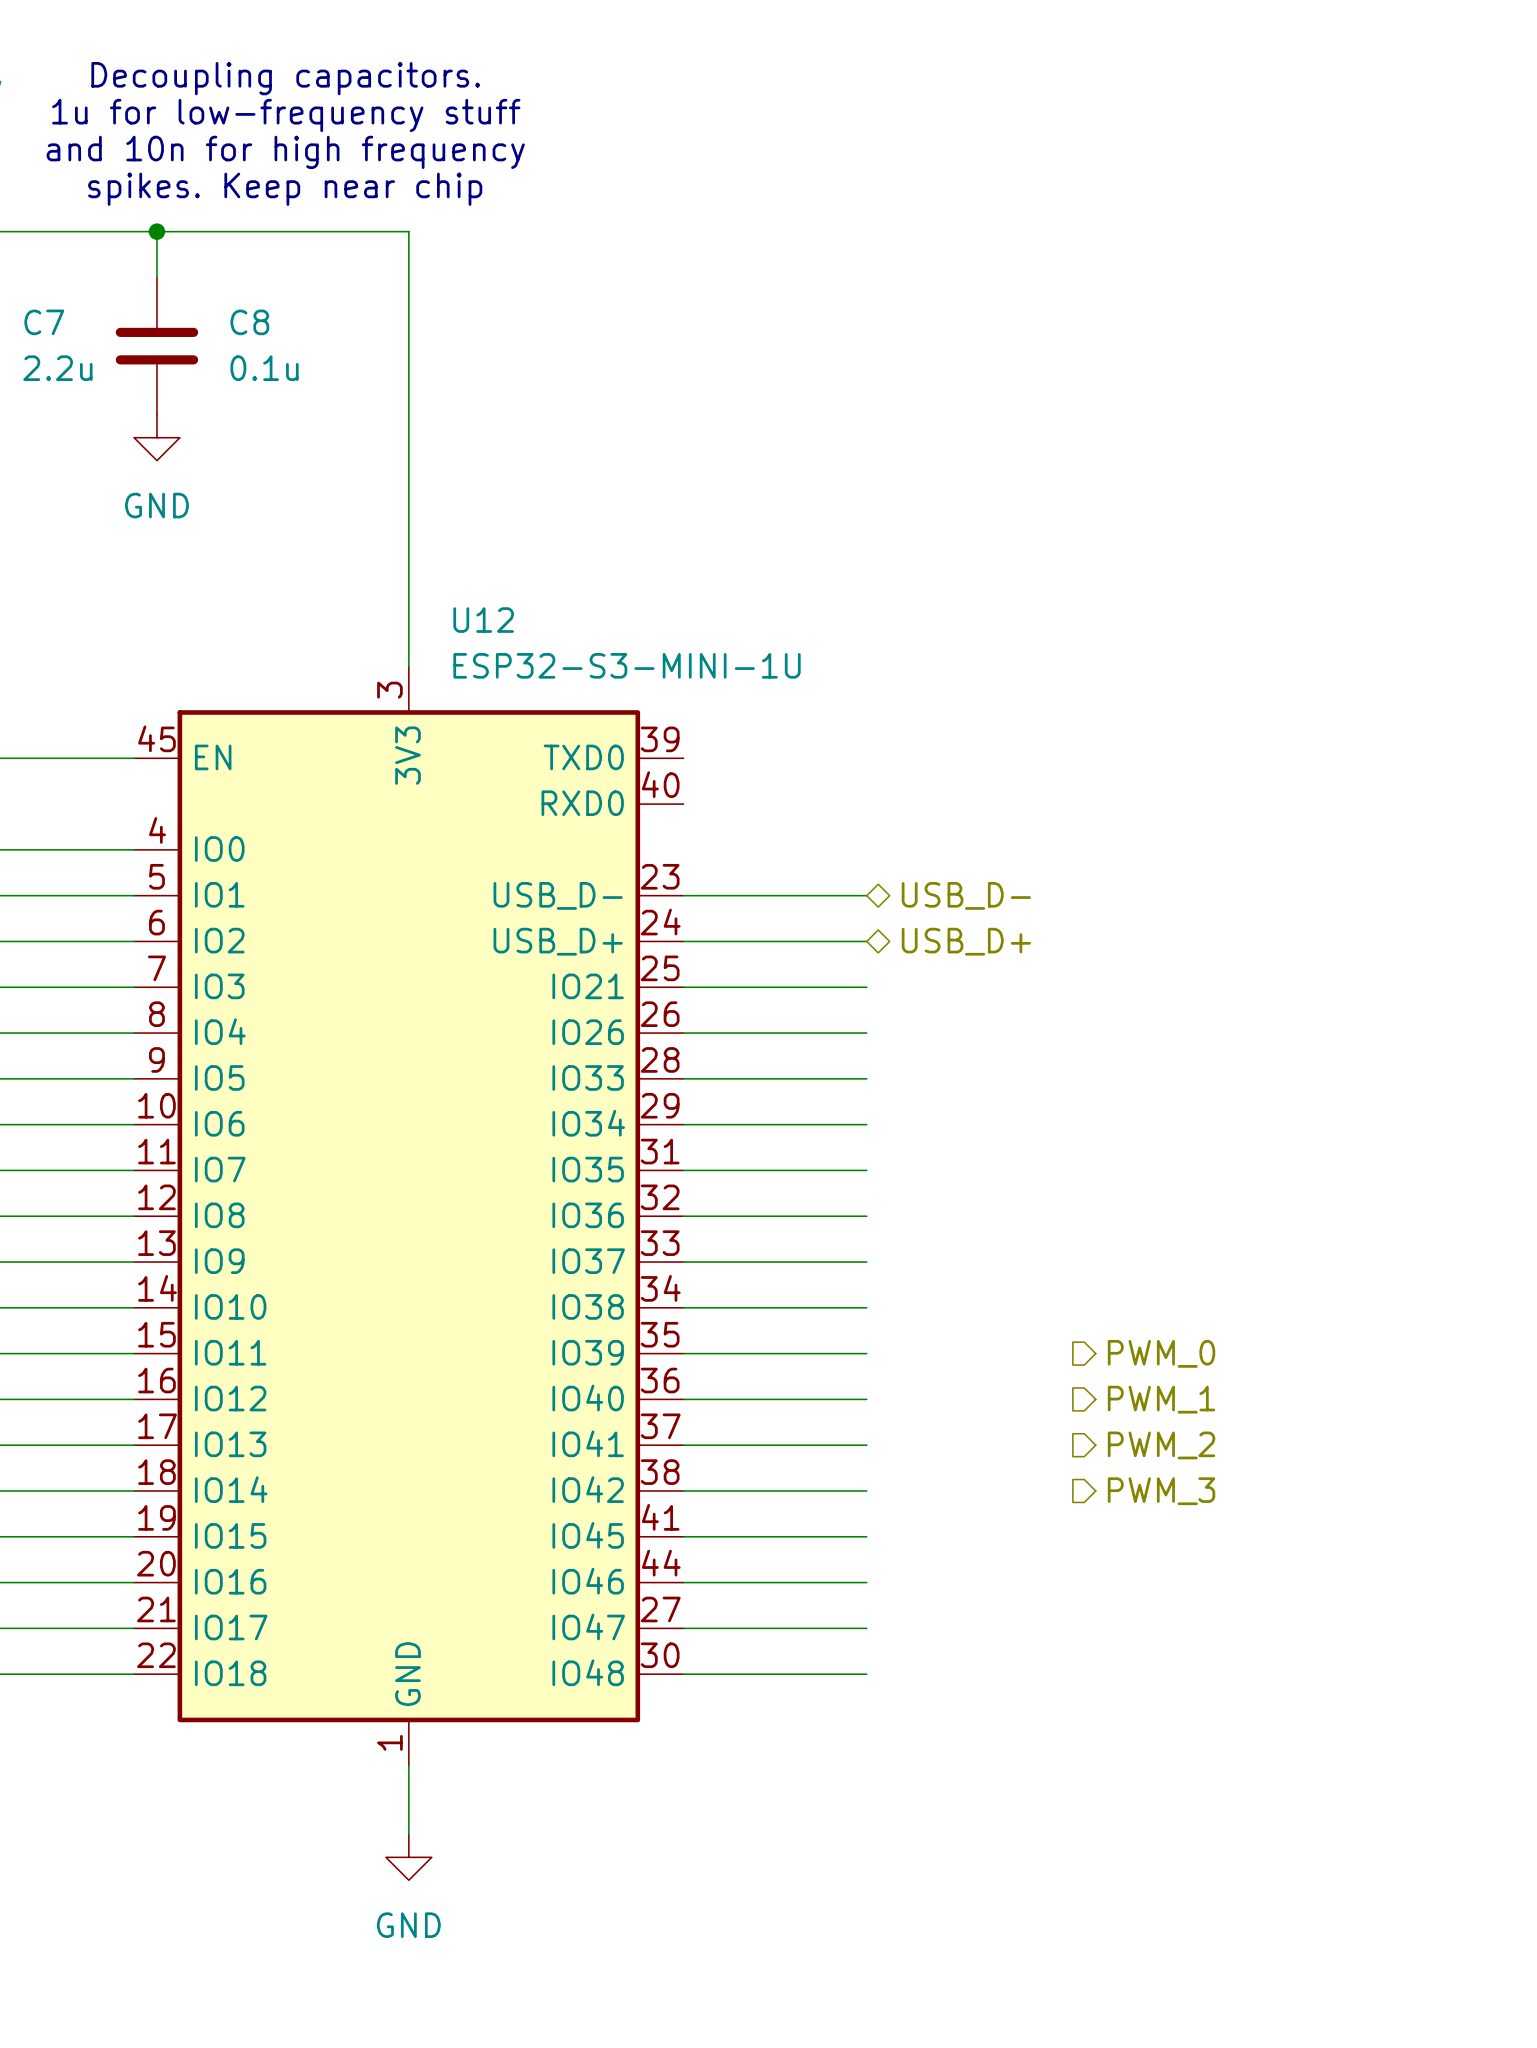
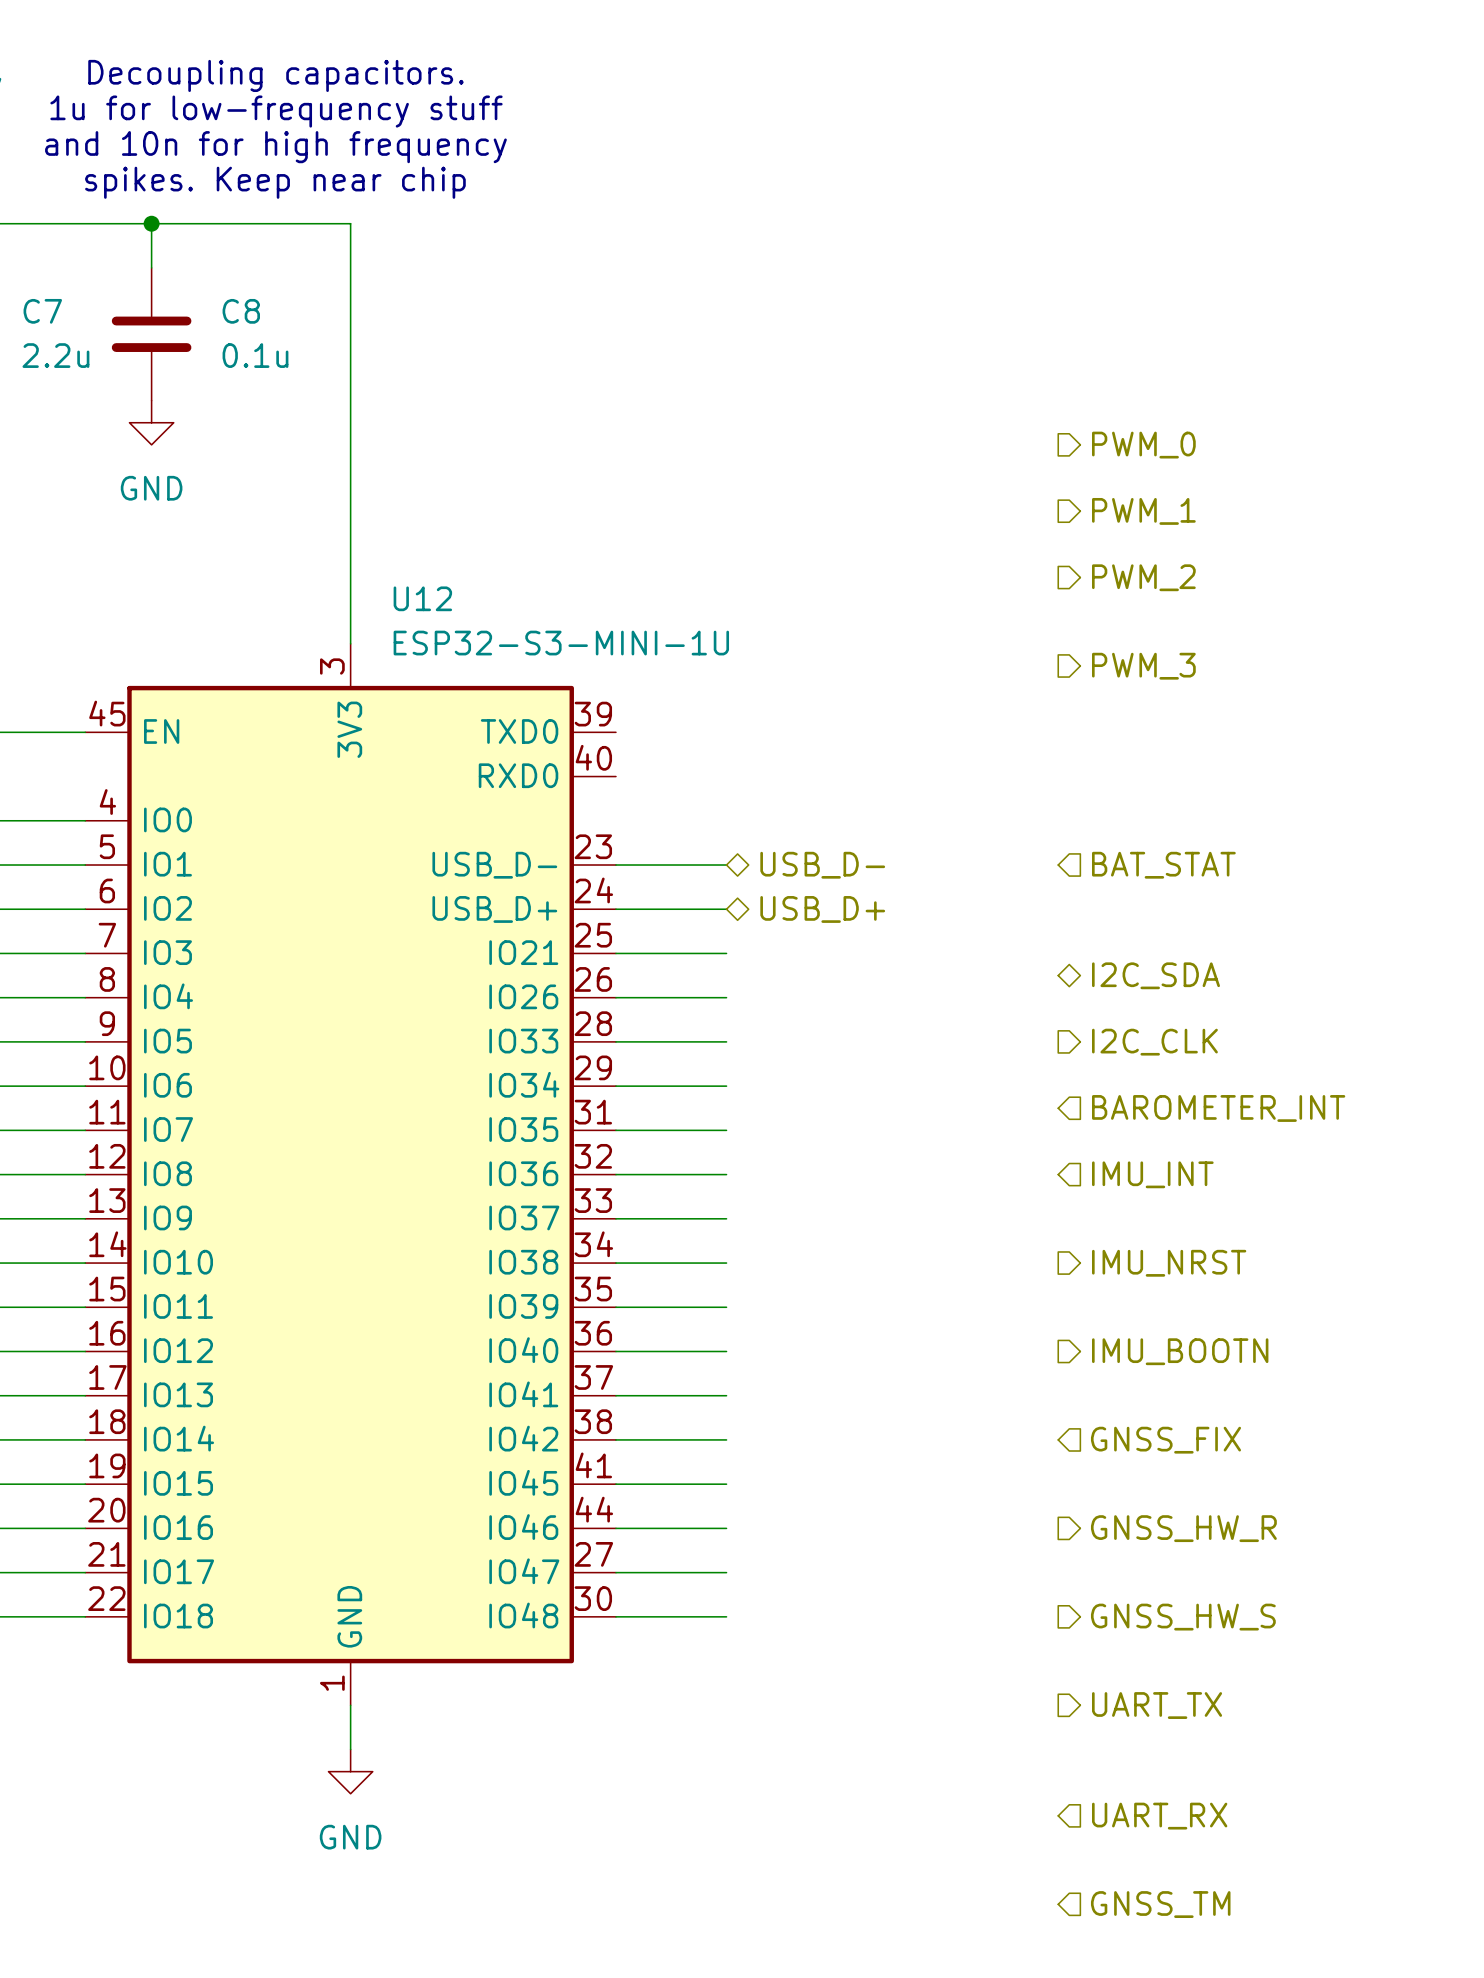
wire: (363, 231) (408, 231) (408, 666) -> (350, 223) (350, 643)
hierarchical label: none -> PWM_0 (1143, 445)
hierarchical label: none -> PWM_1 (1143, 511)
hierarchical label: none -> PWM_2 (1143, 577)
hierarchical label: none -> PWM_3 (1143, 666)
wire: (752, 895) (866, 895) -> none
hierarchical label position: USB_D- (966, 895) -> USB_D- (822, 865)
hierarchical label: none -> BAT_STAT (1163, 865)
wire: (752, 941) (866, 941) -> none
hierarchical label position: USB_D+ (966, 941) -> USB_D+ (822, 909)
wire: (752, 987) (866, 987) -> none
hierarchical label: none -> I2C_SDA (1155, 975)
wire: (752, 1033) (866, 1033) -> none
wire: (752, 1078) (866, 1078) -> none
hierarchical label: none -> I2C_CLK (1154, 1042)
wire: (752, 1124) (866, 1124) -> none
hierarchical label: none -> BAROMETER_INT (1218, 1108)
wire: (752, 1170) (866, 1170) -> none
U12 position: (408, 1216) -> (350, 1174)
wire: (752, 1216) (866, 1216) -> none
hierarchical label: none -> IMU_INT (1152, 1174)
wire: (752, 1262) (866, 1262) -> none
wire: (752, 1307) (866, 1307) -> none
hierarchical label: none -> IMU_NRST (1169, 1263)
wire: (752, 1353) (866, 1353) -> none
hierarchical label: PWM_0 (1161, 1353) -> none
wire: (752, 1399) (866, 1399) -> none
hierarchical label: PWM_1 (1161, 1399) -> none
hierarchical label: none -> IMU_BOOTN (1180, 1351)
wire: (752, 1445) (866, 1445) -> none
hierarchical label: PWM_2 (1161, 1445) -> none
wire: (752, 1490) (866, 1490) -> none
hierarchical label: PWM_3 (1161, 1491) -> none
hierarchical label: none -> GNSS_FIX (1165, 1440)
wire: (752, 1536) (866, 1536) -> none
wire: (752, 1582) (866, 1582) -> none
hierarchical label: none -> GNSS_HW_R (1183, 1528)
wire: (752, 1628) (866, 1628) -> none
wire: (752, 1674) (866, 1674) -> none
hierarchical label: none -> GNSS_HW_S (1183, 1617)
wire: none -> (350, 1705) (350, 1749)
wire: (408, 1765) (408, 1834) -> none
hierarchical label: none -> UART_TX (1157, 1705)
power symbol position: GND (408, 1857) -> GND (350, 1771)
hierarchical label: none -> UART_RX (1159, 1816)
hierarchical label: none -> GNSS_TM (1160, 1904)

